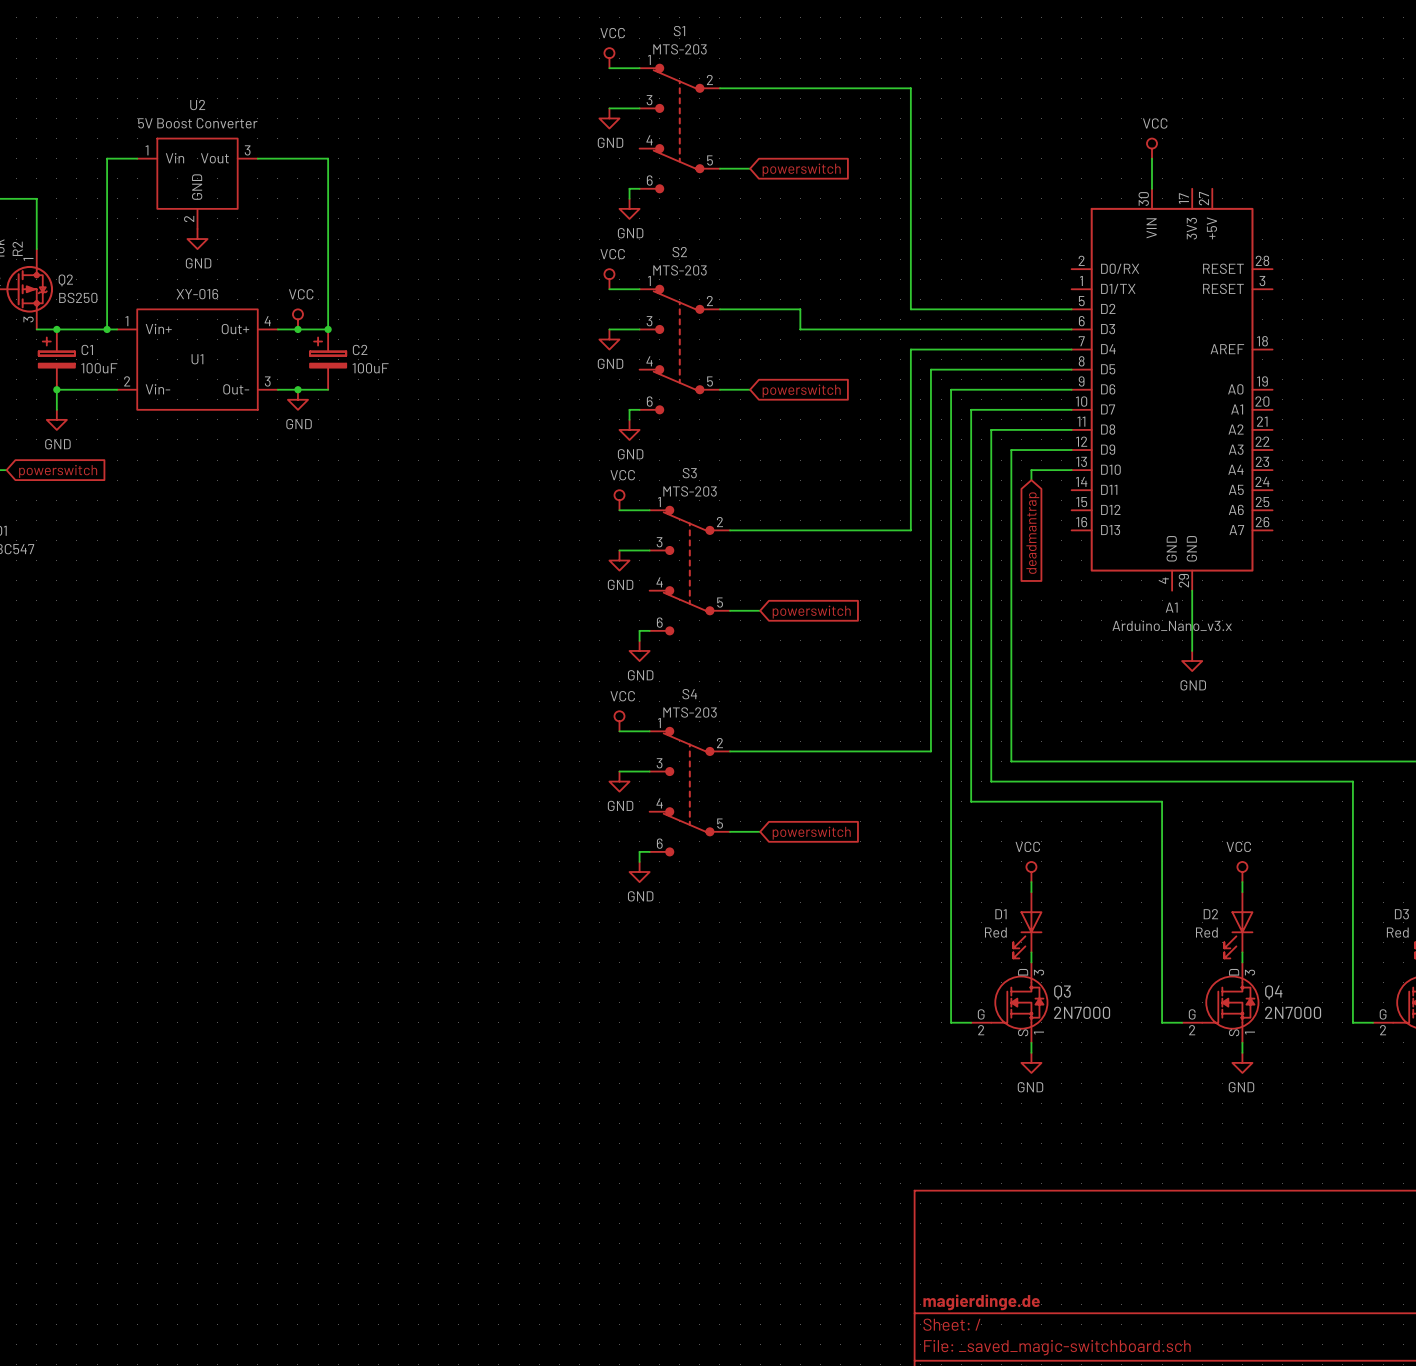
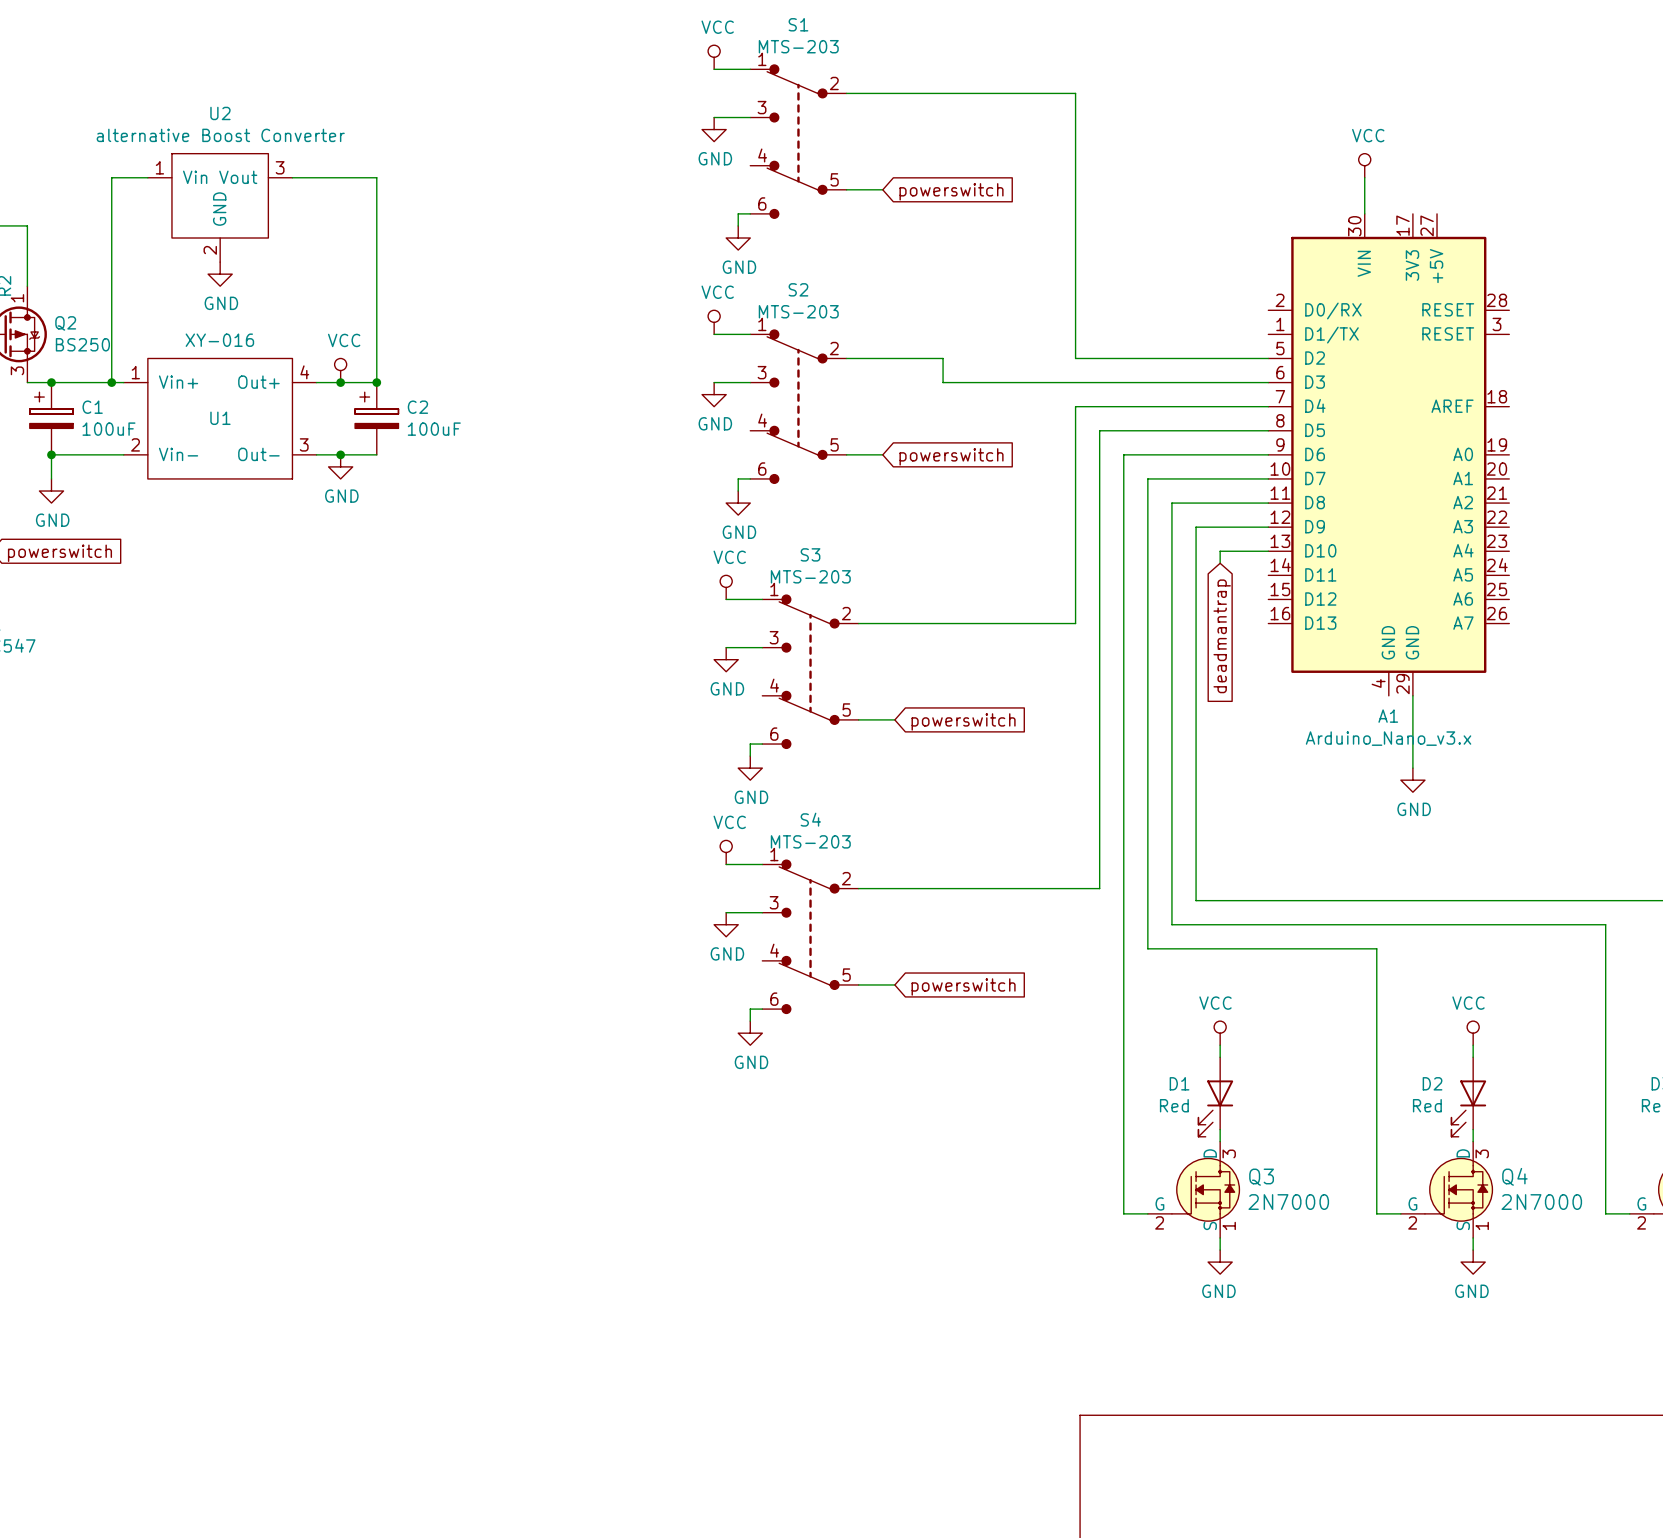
U2 value: 5V Boost Converter (197, 123) -> alternative Boost Converter (220, 135)

